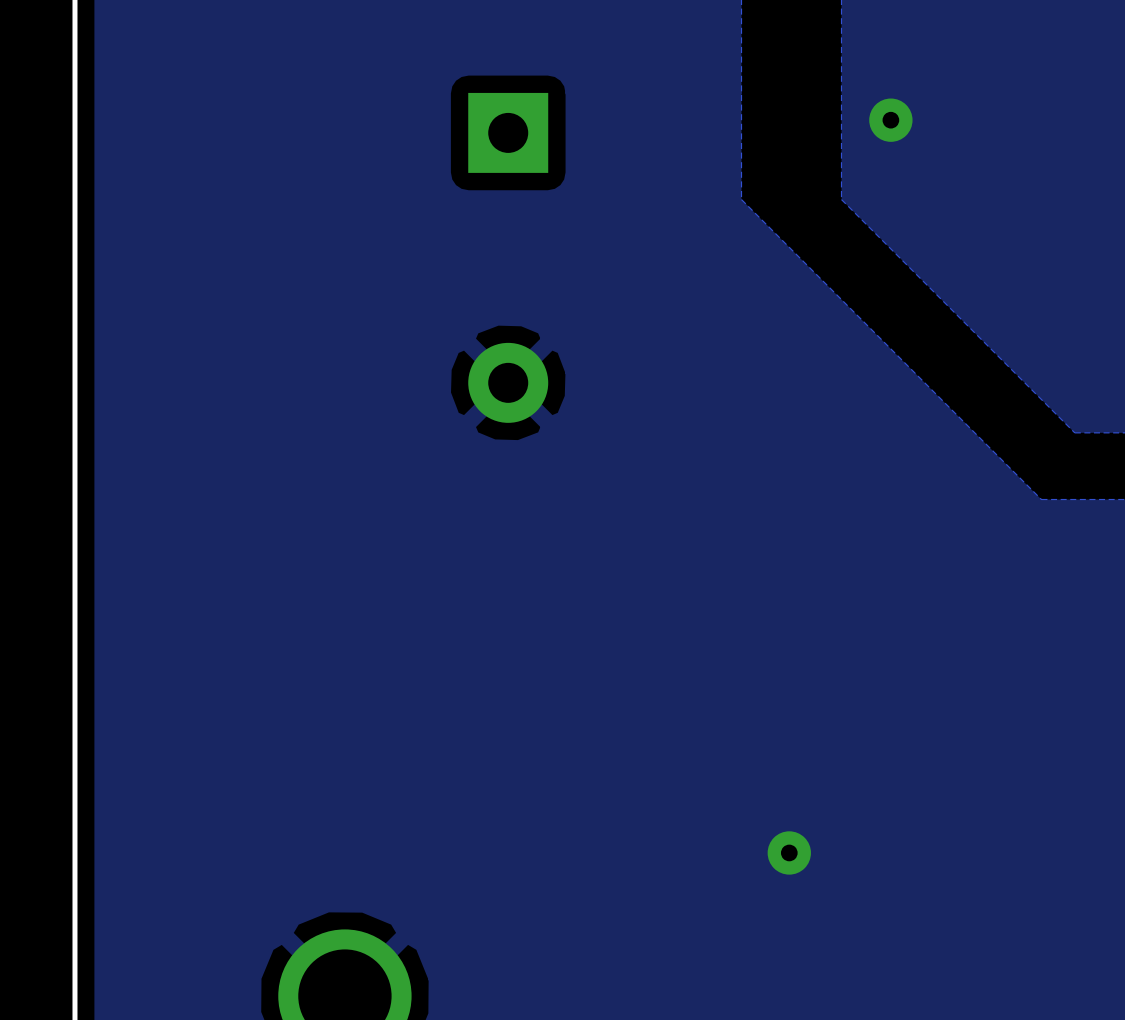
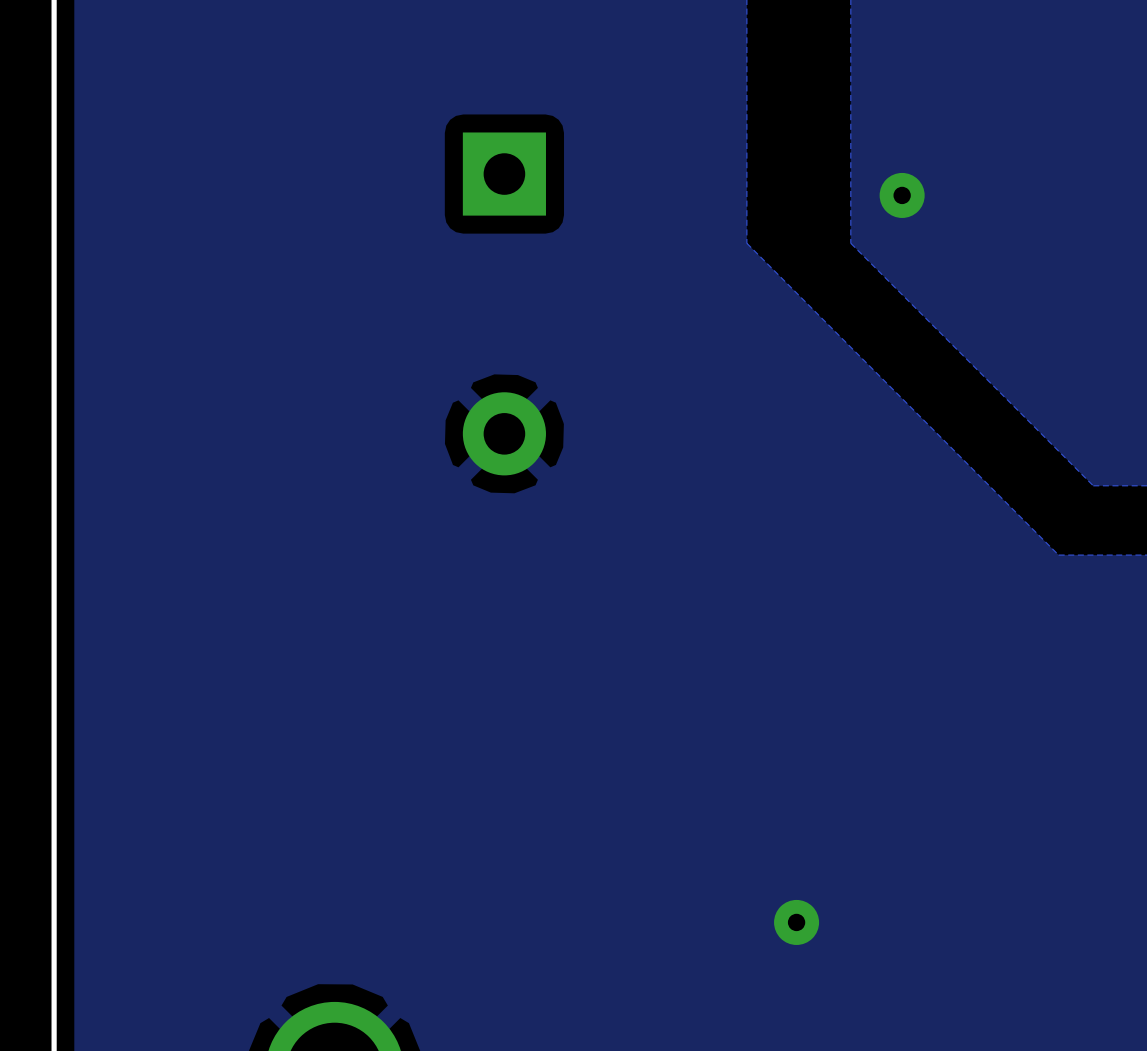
via position: (890, 120) -> (902, 195)

